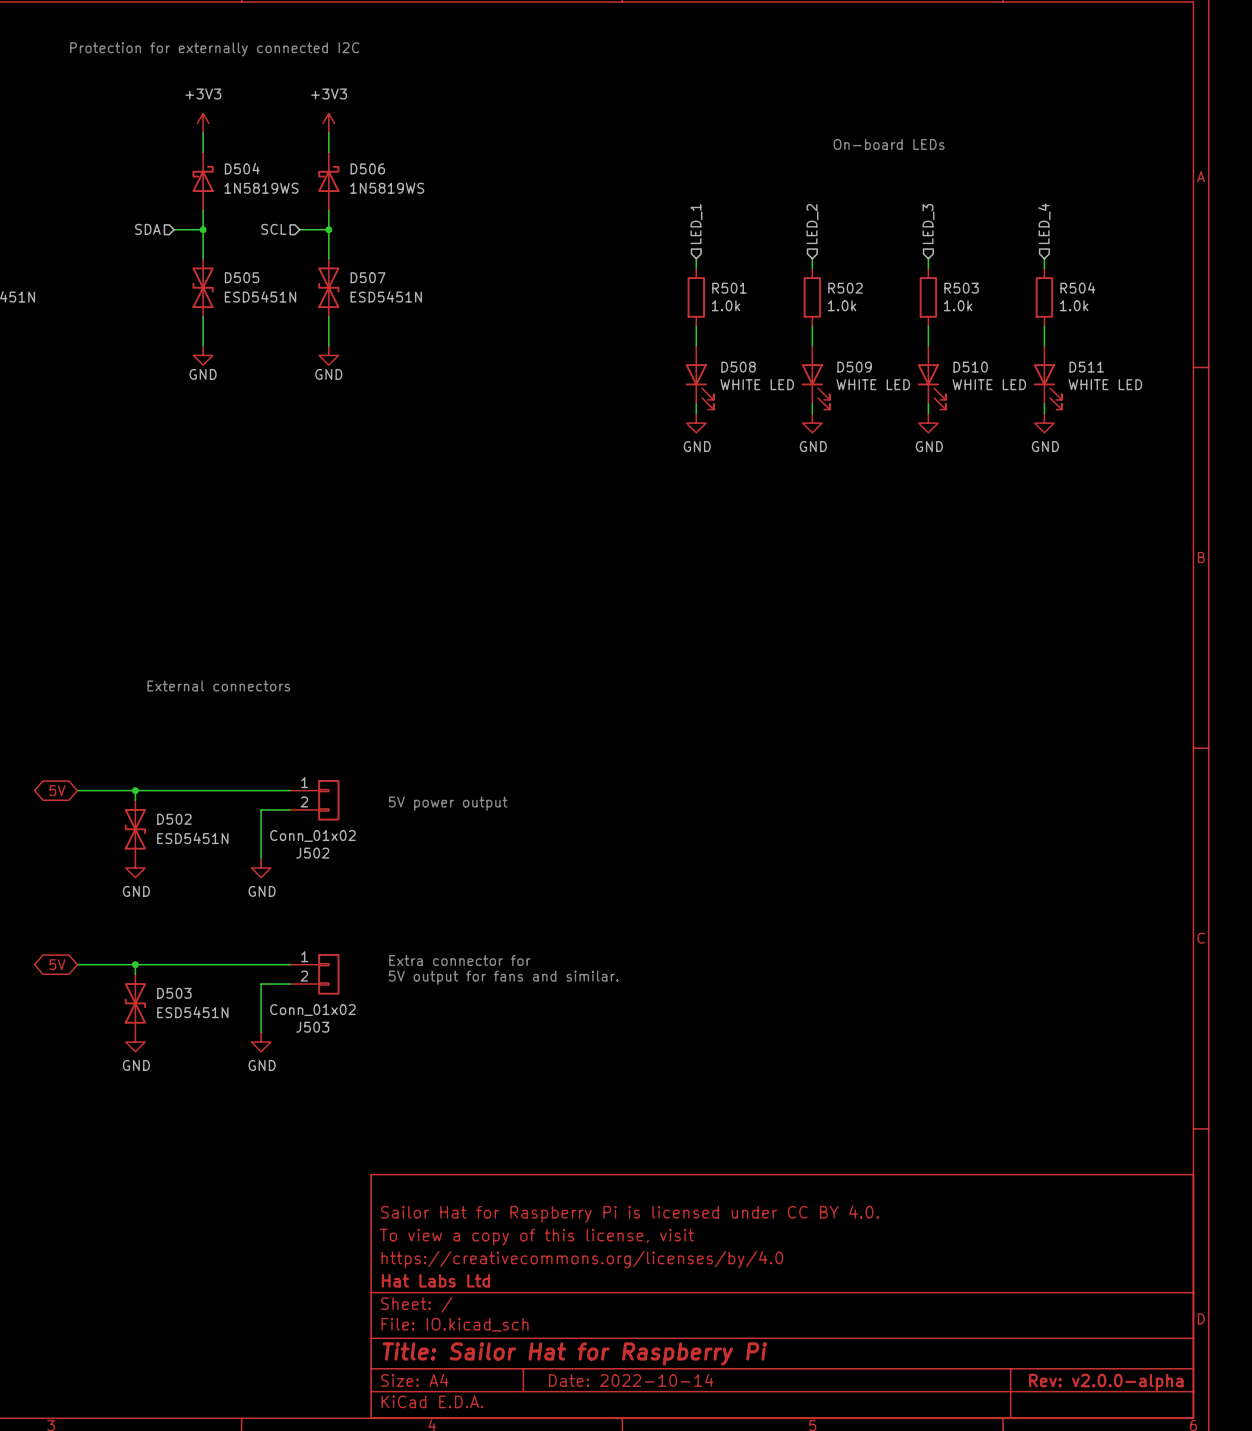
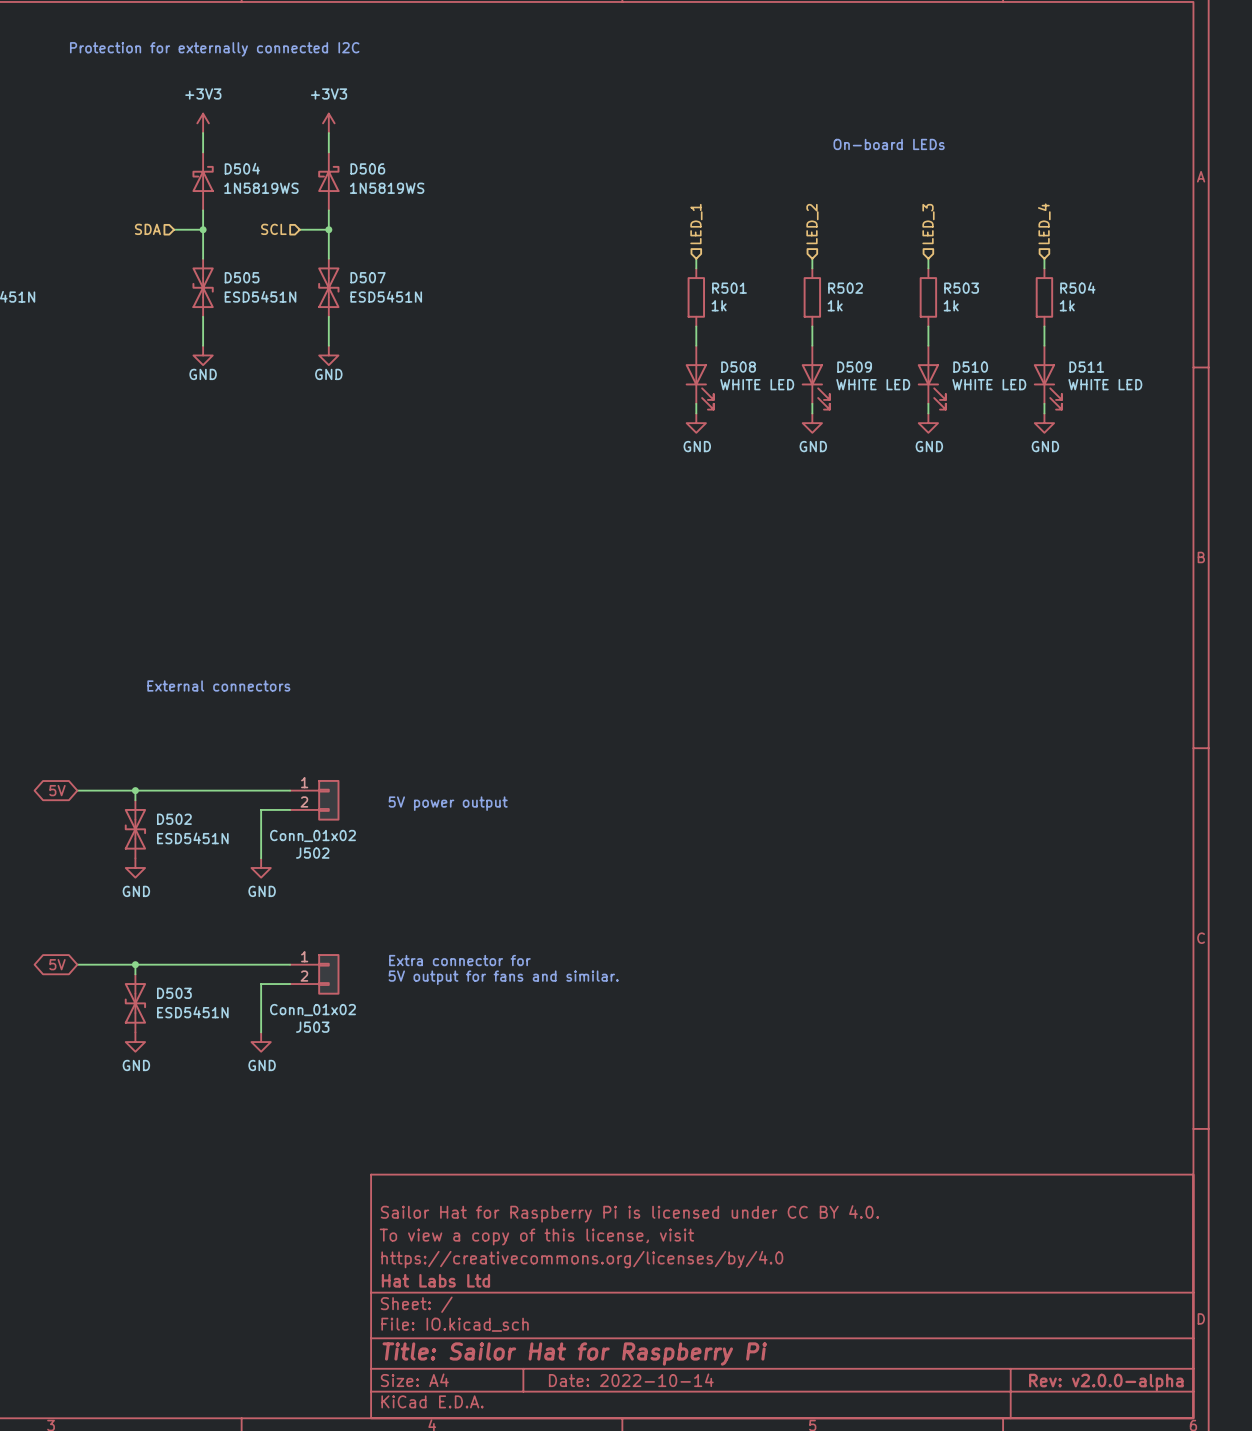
R501 value: 1.0k (726, 305) -> 1k (719, 305)
R502 value: 1.0k (842, 305) -> 1k (835, 305)
R503 value: 1.0k (958, 305) -> 1k (951, 305)
R504 value: 1.0k (1074, 305) -> 1k (1067, 305)

